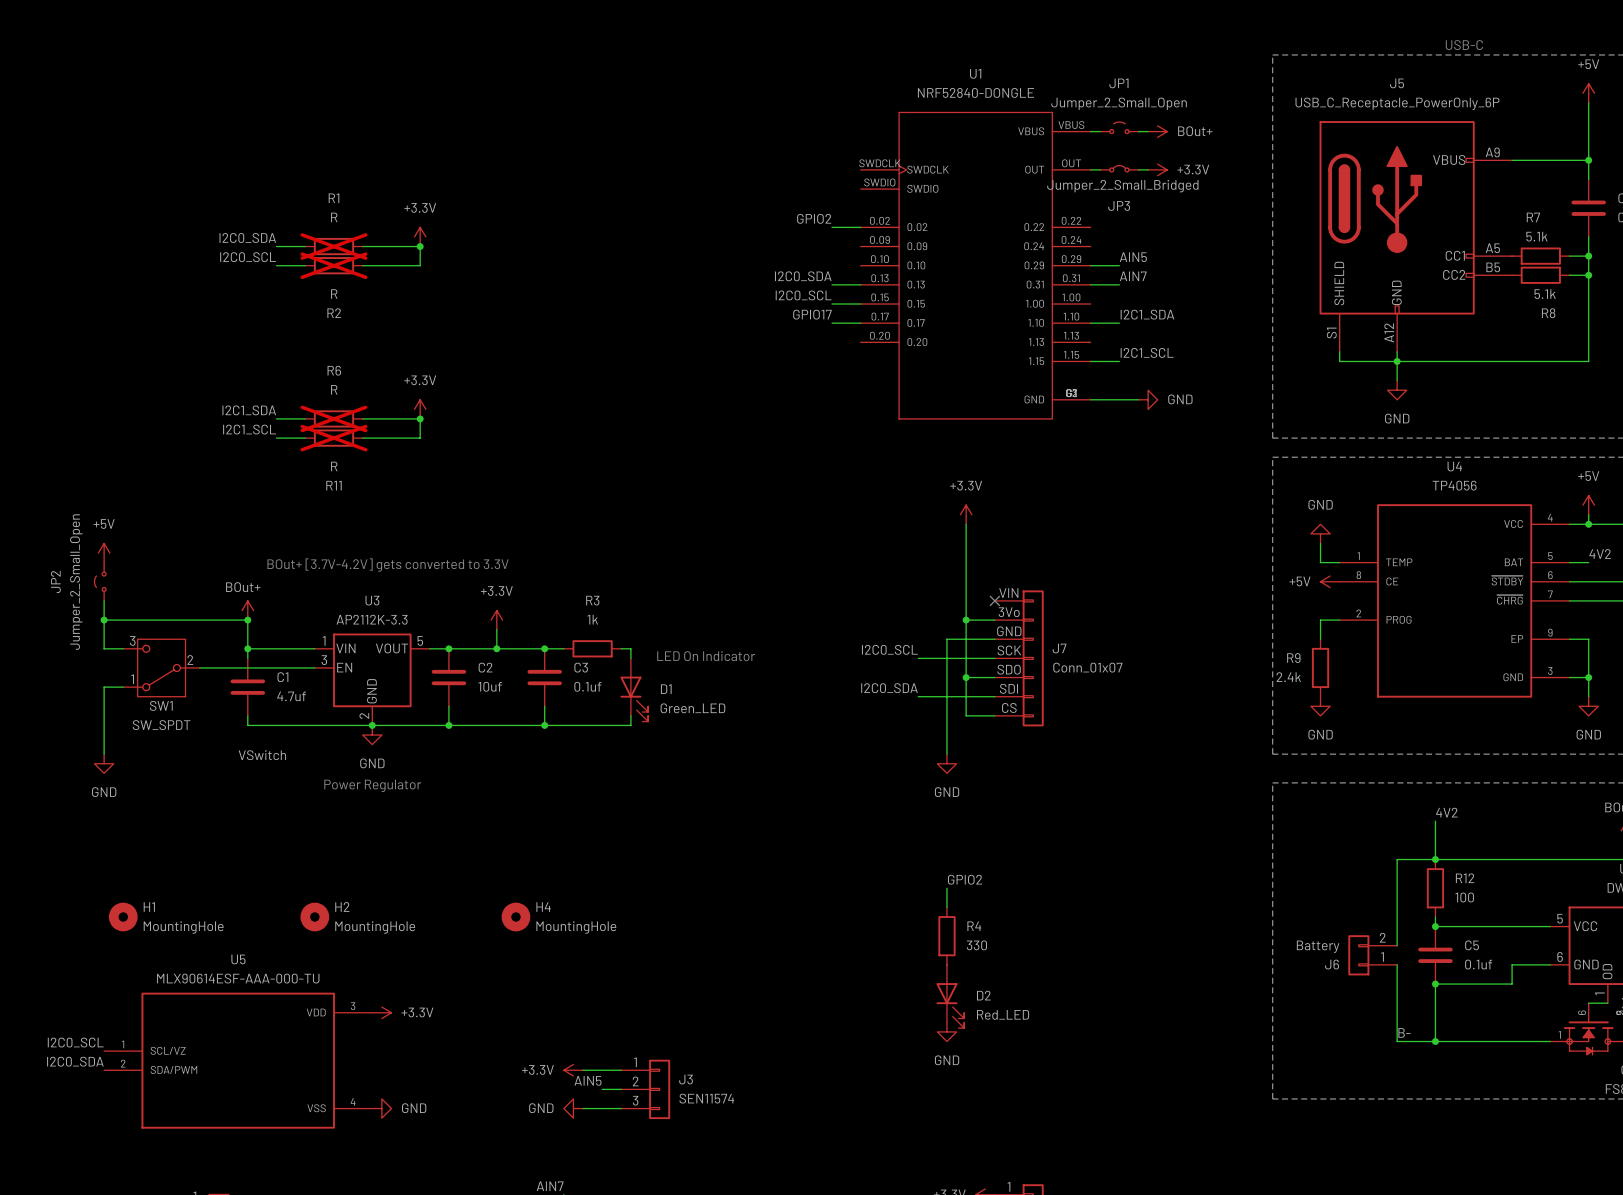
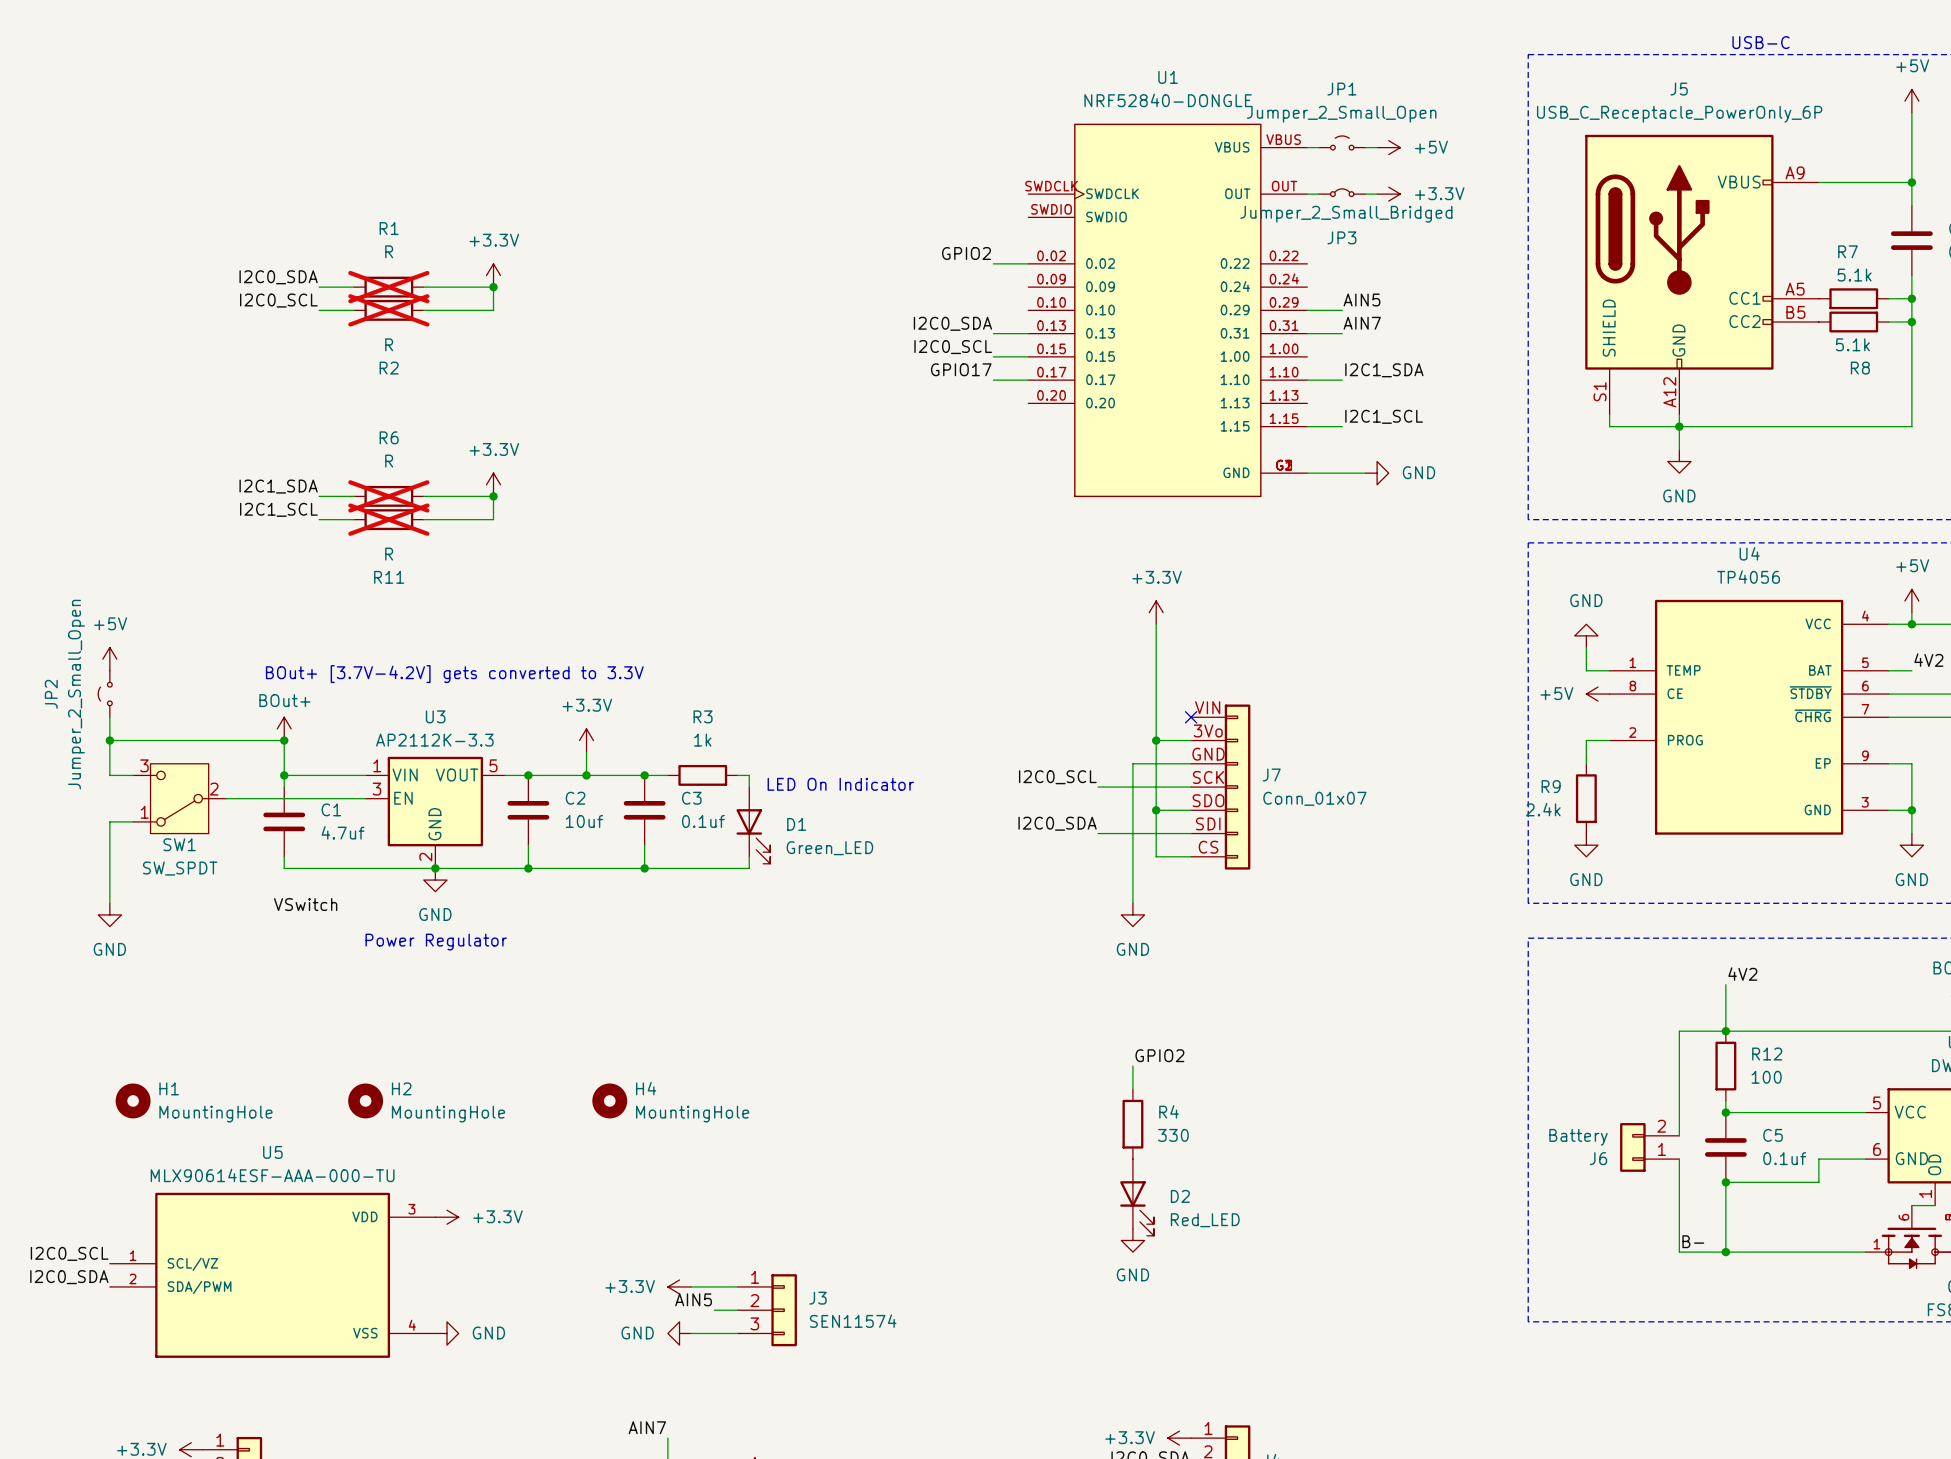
power symbol: BOut+ (1157, 131) -> +5V (1388, 147)

